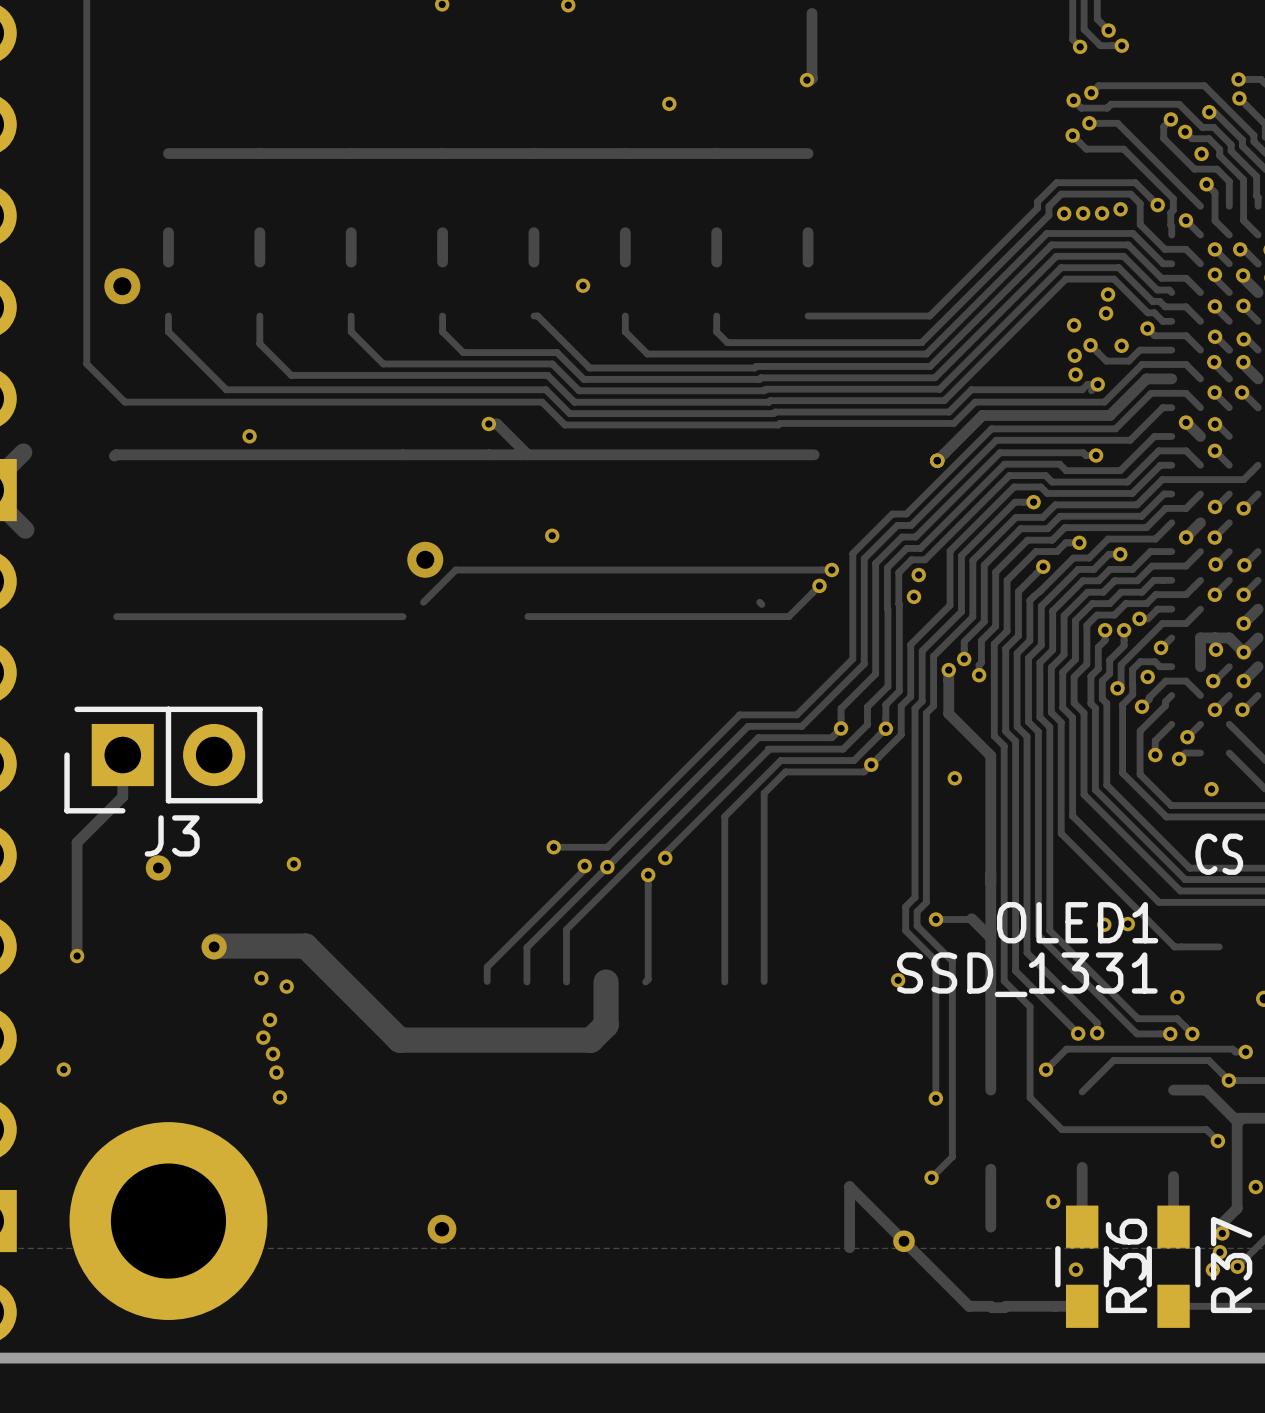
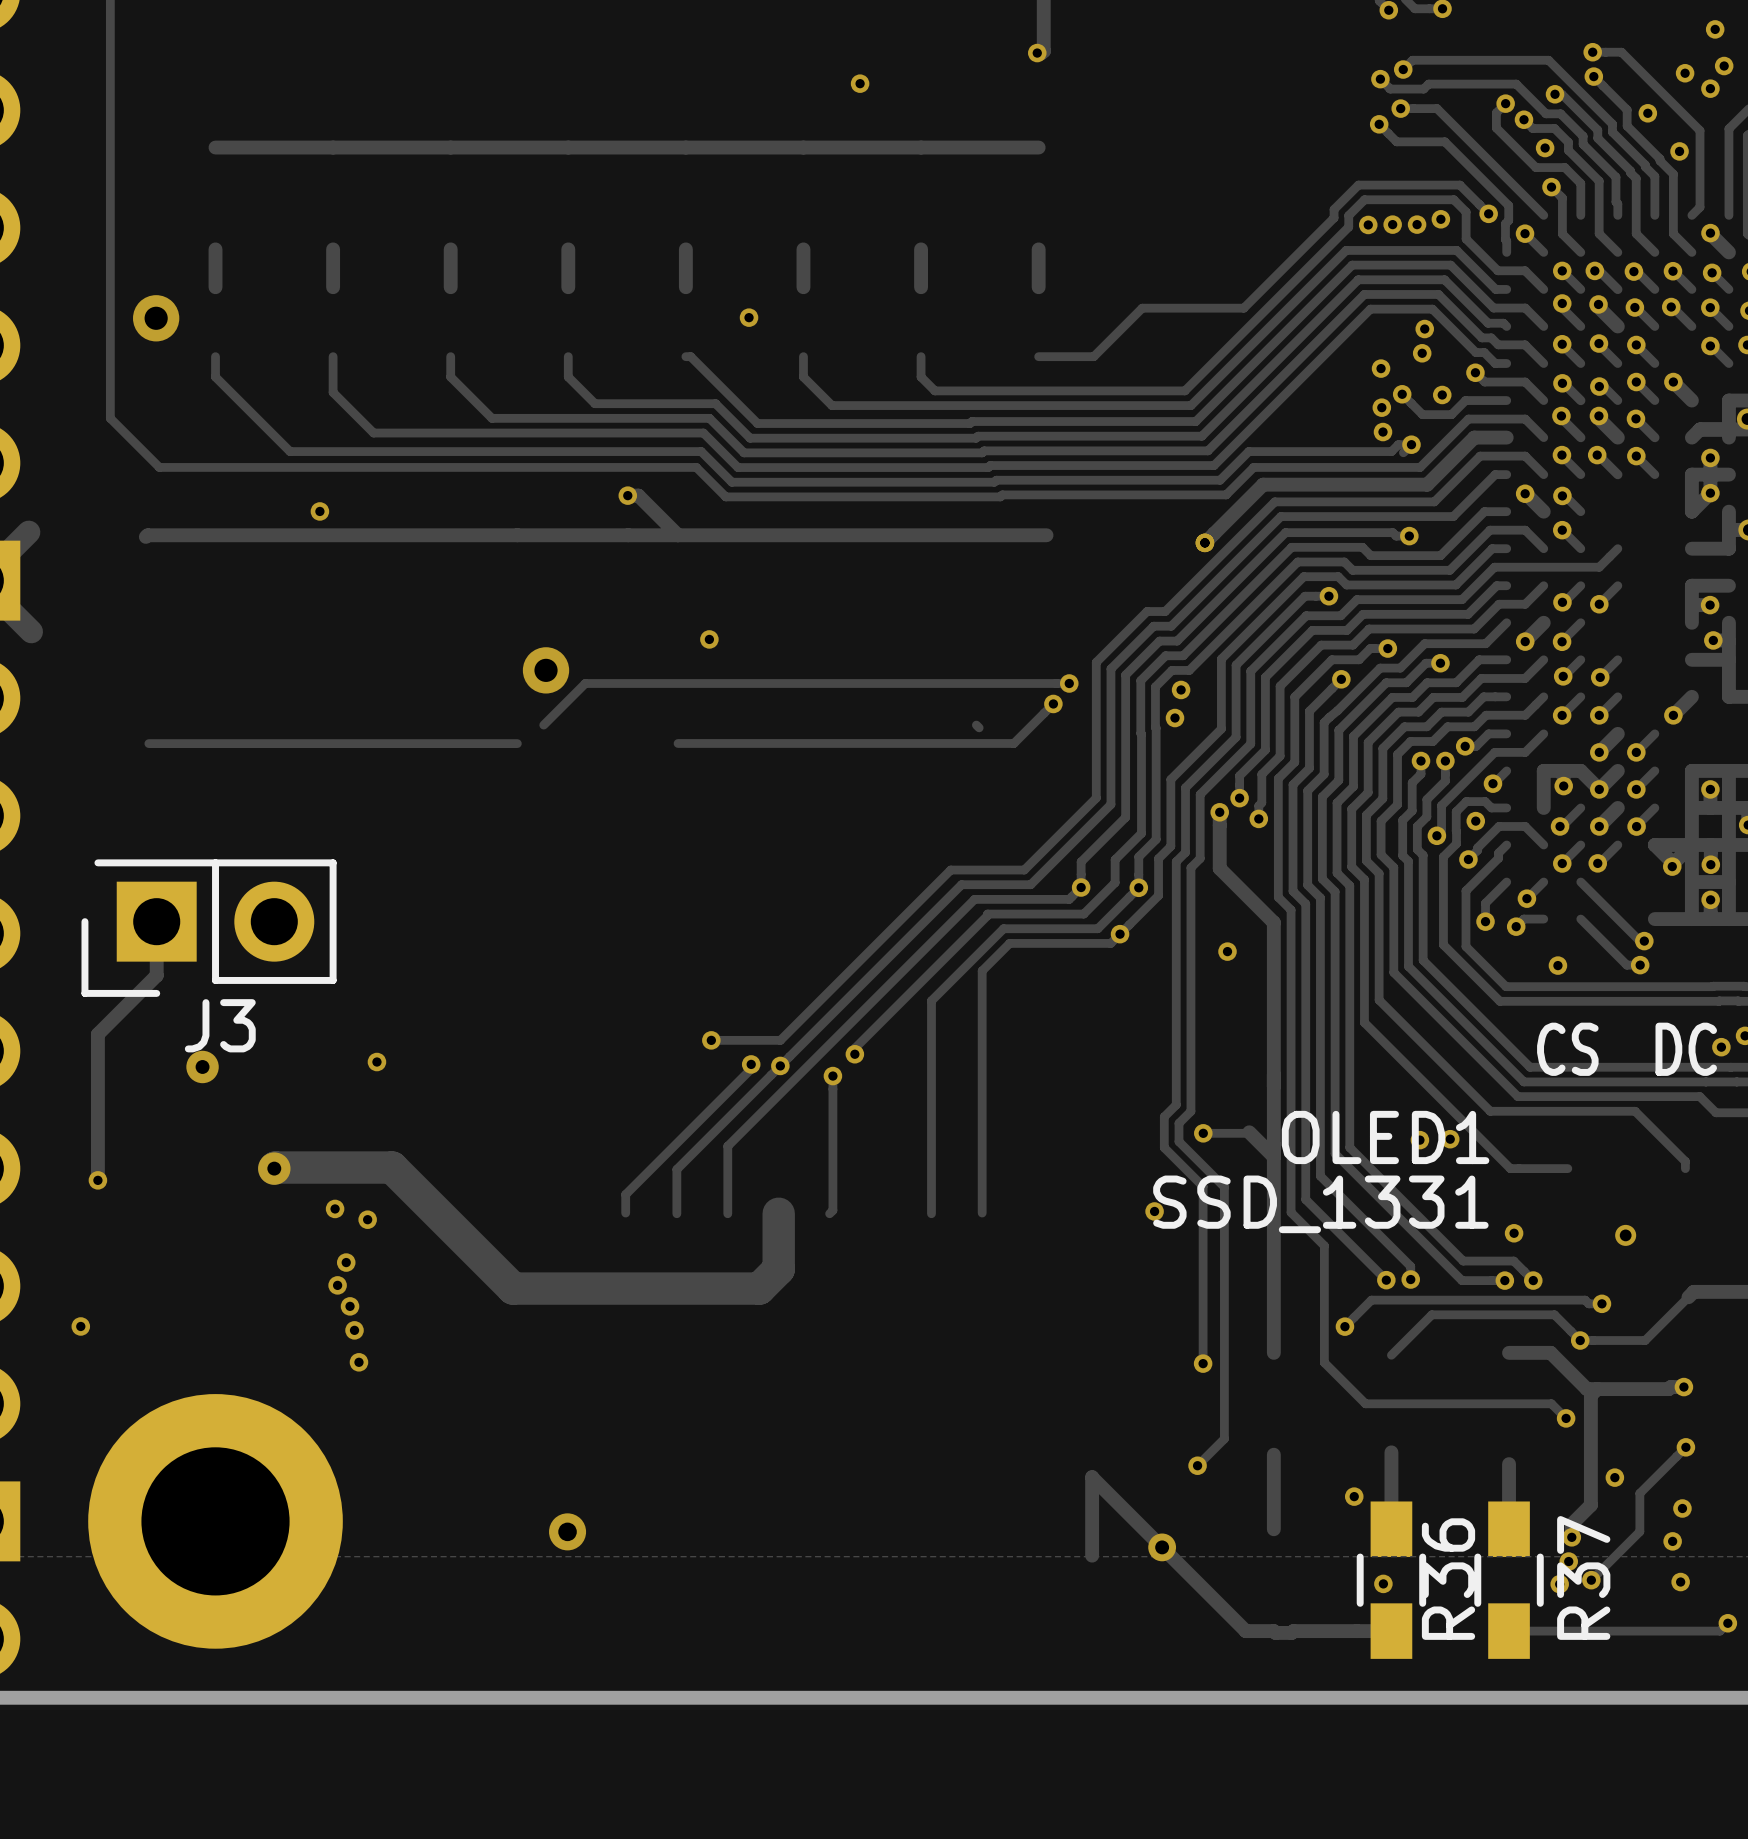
track: (967, 278) (929, 316) (850, 316) -> (1243, 308) (1142, 308) (1093, 356)

